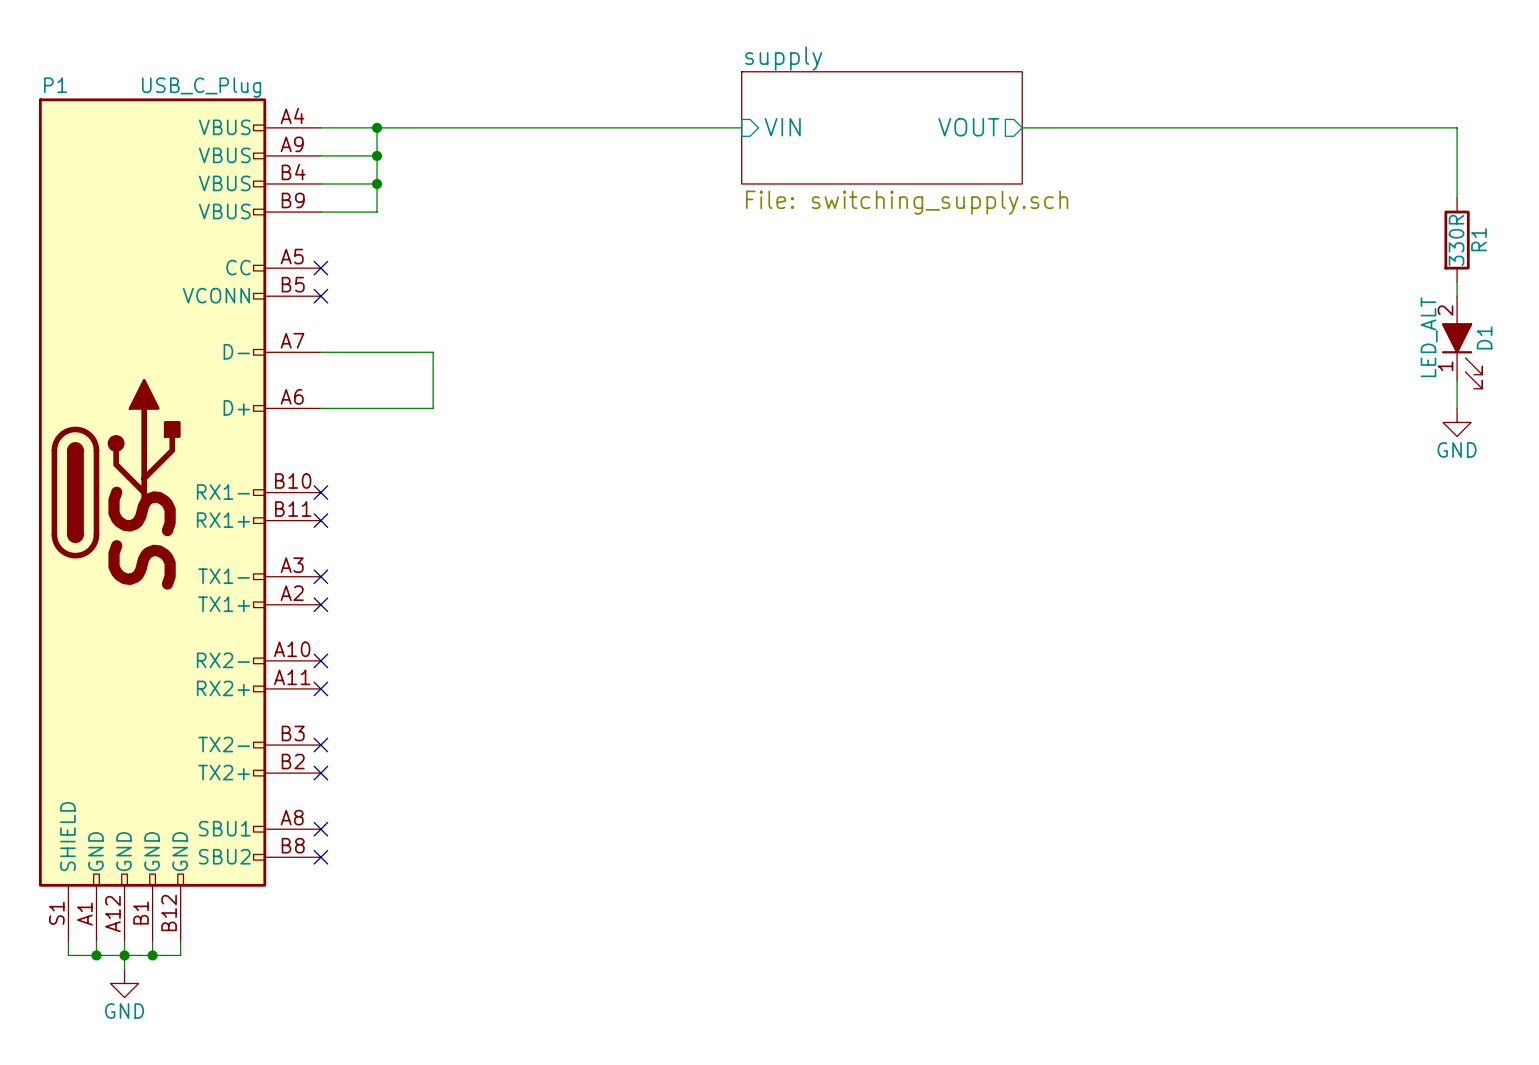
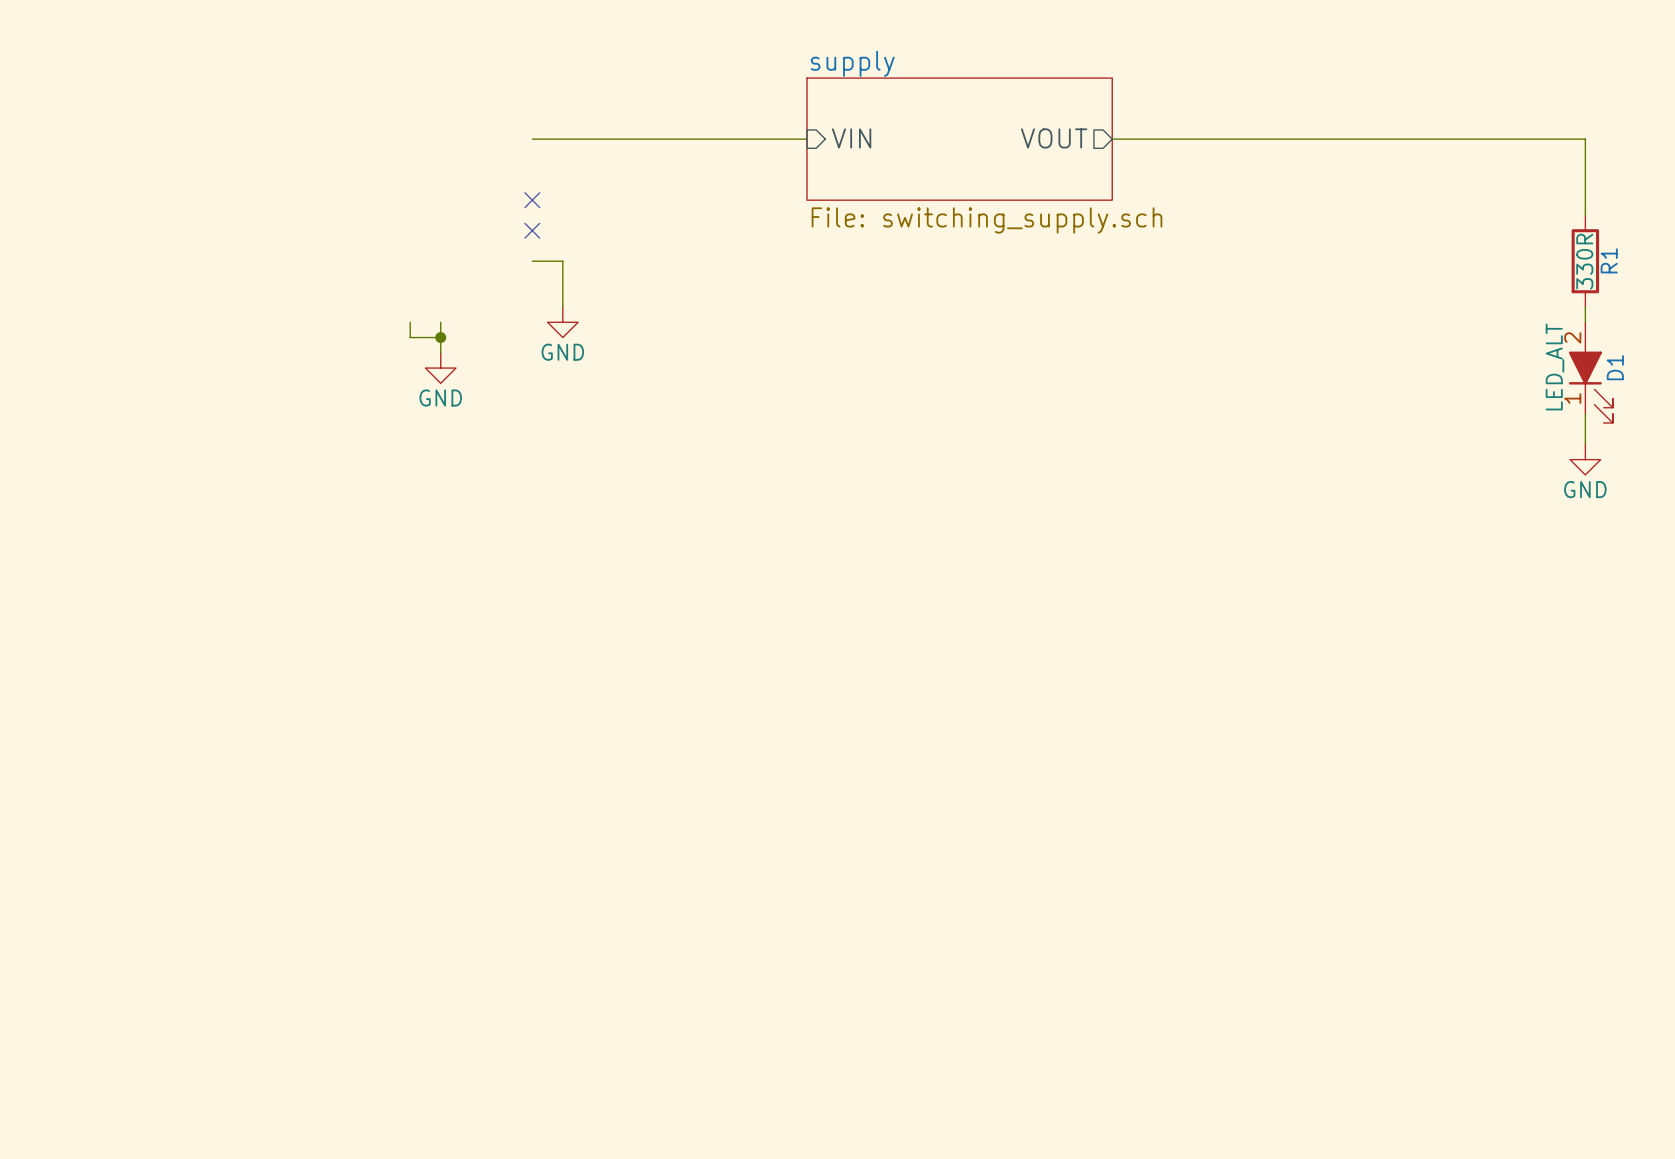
wire: (320, 127) (489, 127) -> none
wire: (377, 127) (377, 212) (320, 212) -> none
junction: (377, 127) -> none
wire: (320, 155) (377, 155) -> none
junction: (377, 155) -> none
wire: (320, 183) (377, 183) -> none
junction: (377, 183) -> none
no-connect mark: none -> (532, 200)
no-connect mark: none -> (532, 230)
wire: none -> (532, 261) (562, 261) (562, 307)
no-connect mark: (320, 268) -> none
no-connect mark: (320, 296) -> none
wire: none -> (410, 322) (410, 337) (440, 337)
wire: none -> (440, 322) (440, 352)
power symbol: none -> GND (562, 322)
junction: none -> (440, 337)
power symbol: none -> GND (440, 368)
wire: (320, 352) (433, 352) (433, 408) (320, 408) -> none
no-connect mark: (320, 492) -> none
P1: USB_C_Plug (179, 519) -> none
no-connect mark: (320, 520) -> none
no-connect mark: (320, 576) -> none
no-connect mark: (320, 604) -> none
no-connect mark: (320, 660) -> none
no-connect mark: (320, 688) -> none
no-connect mark: (320, 745) -> none
no-connect mark: (320, 773) -> none
no-connect mark: (320, 829) -> none
no-connect mark: (320, 857) -> none
wire: (68, 941) (68, 955) (180, 955) (180, 941) -> none
wire: (96, 941) (96, 955) -> none
wire: (124, 941) (124, 969) -> none
wire: (152, 941) (152, 955) -> none
junction: (96, 955) -> none
junction: (124, 955) -> none
junction: (152, 955) -> none
power symbol: GND (124, 983) -> none

